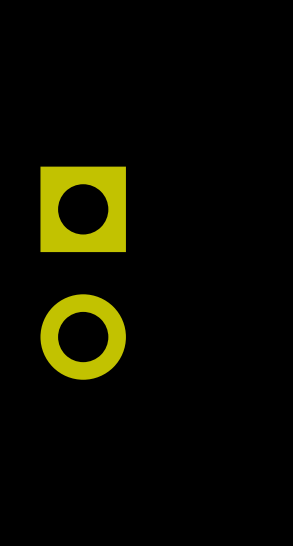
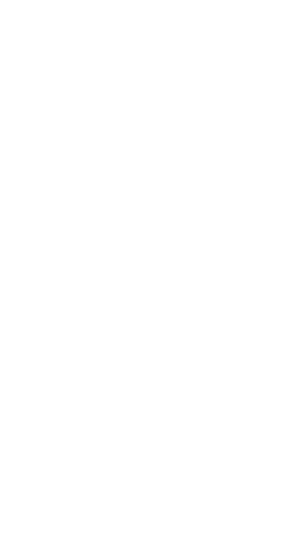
part: (83, 273) -> none

